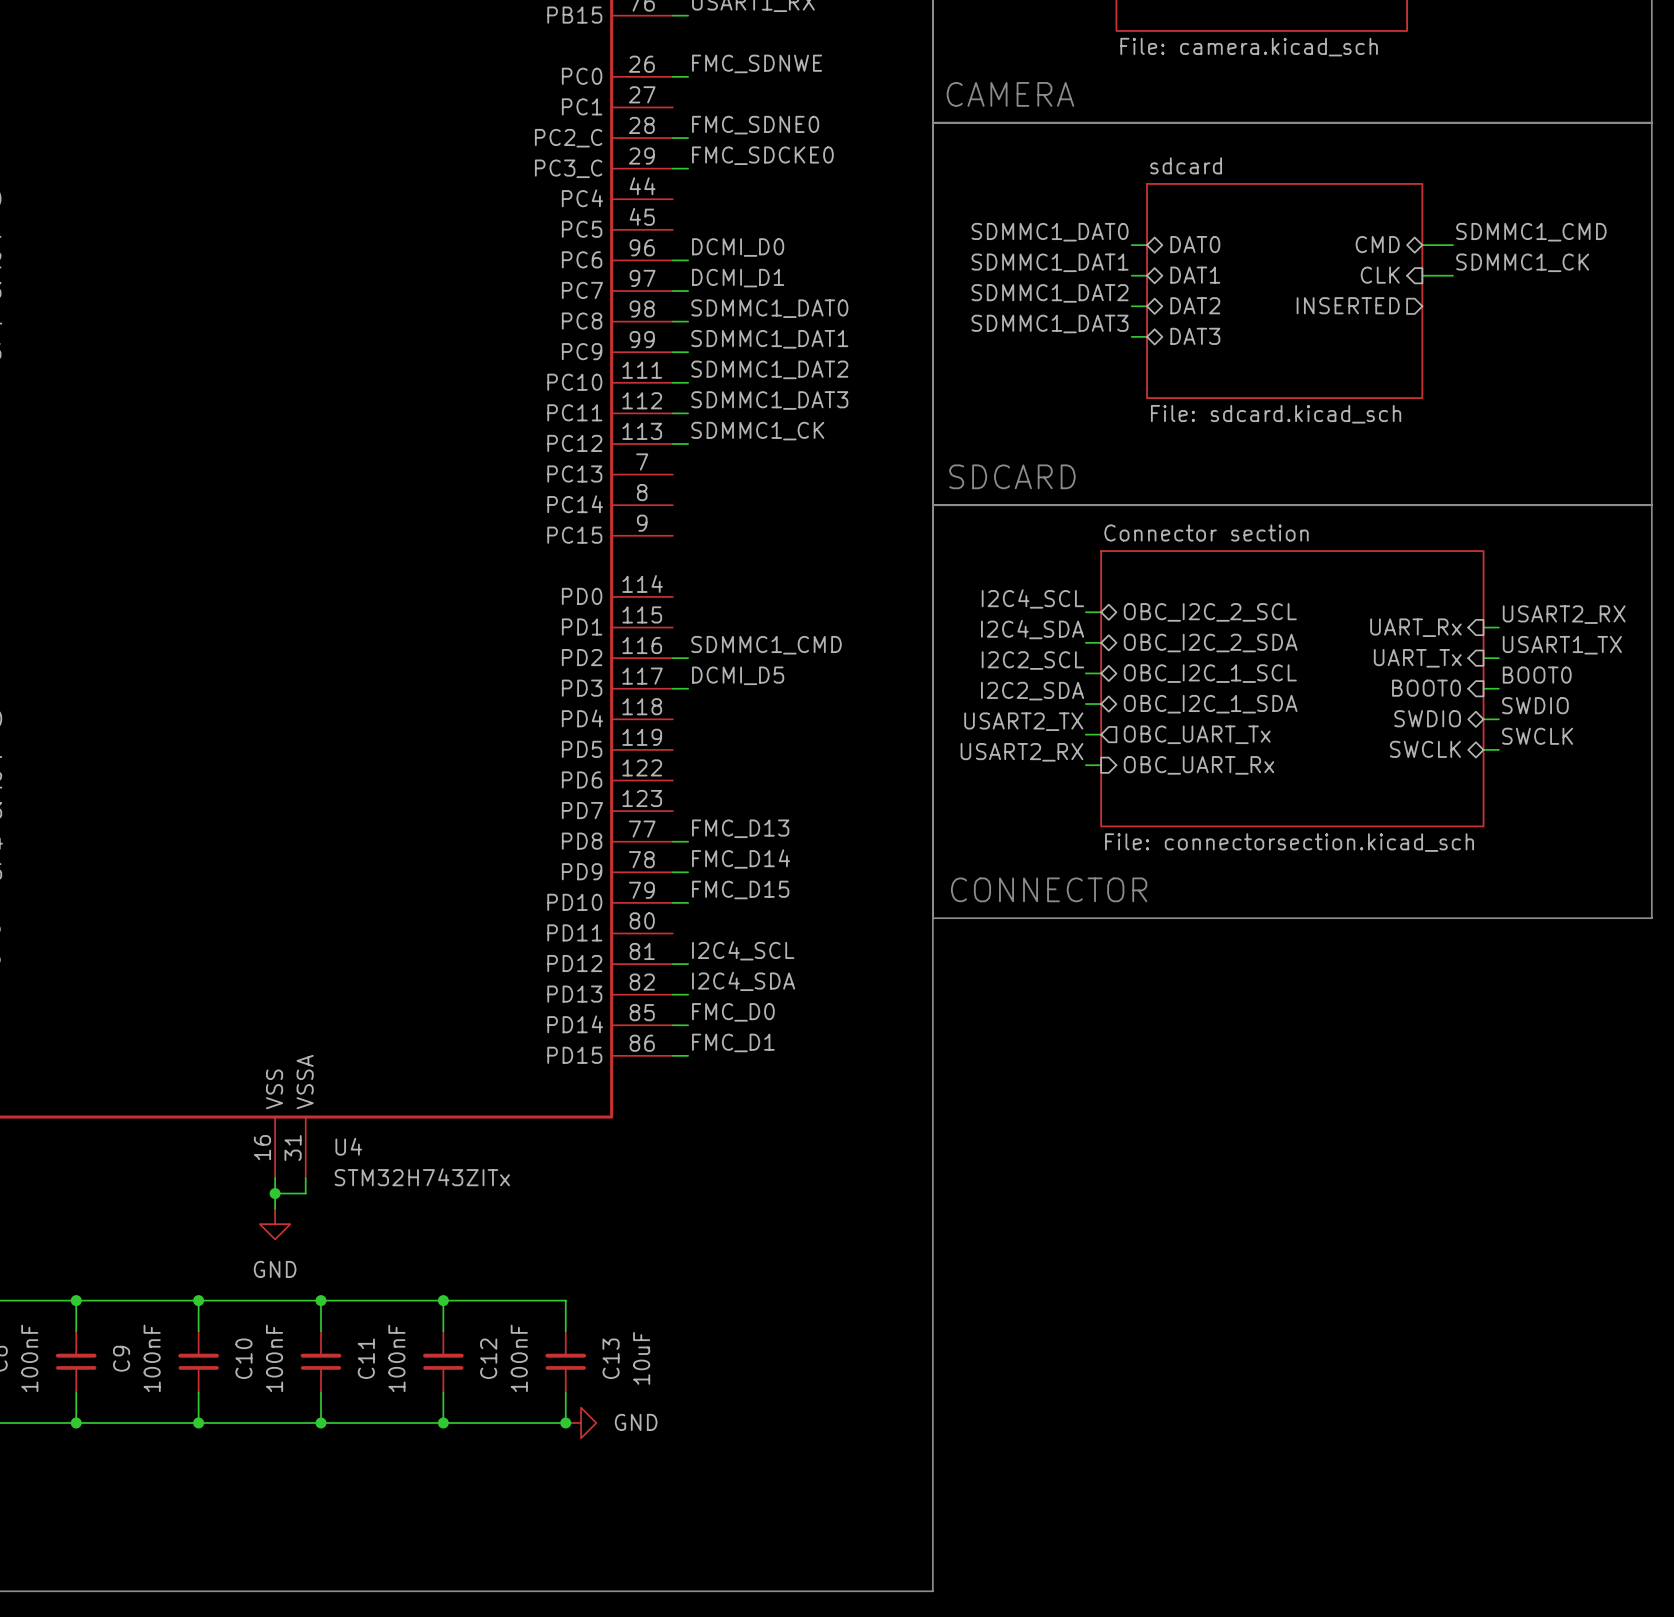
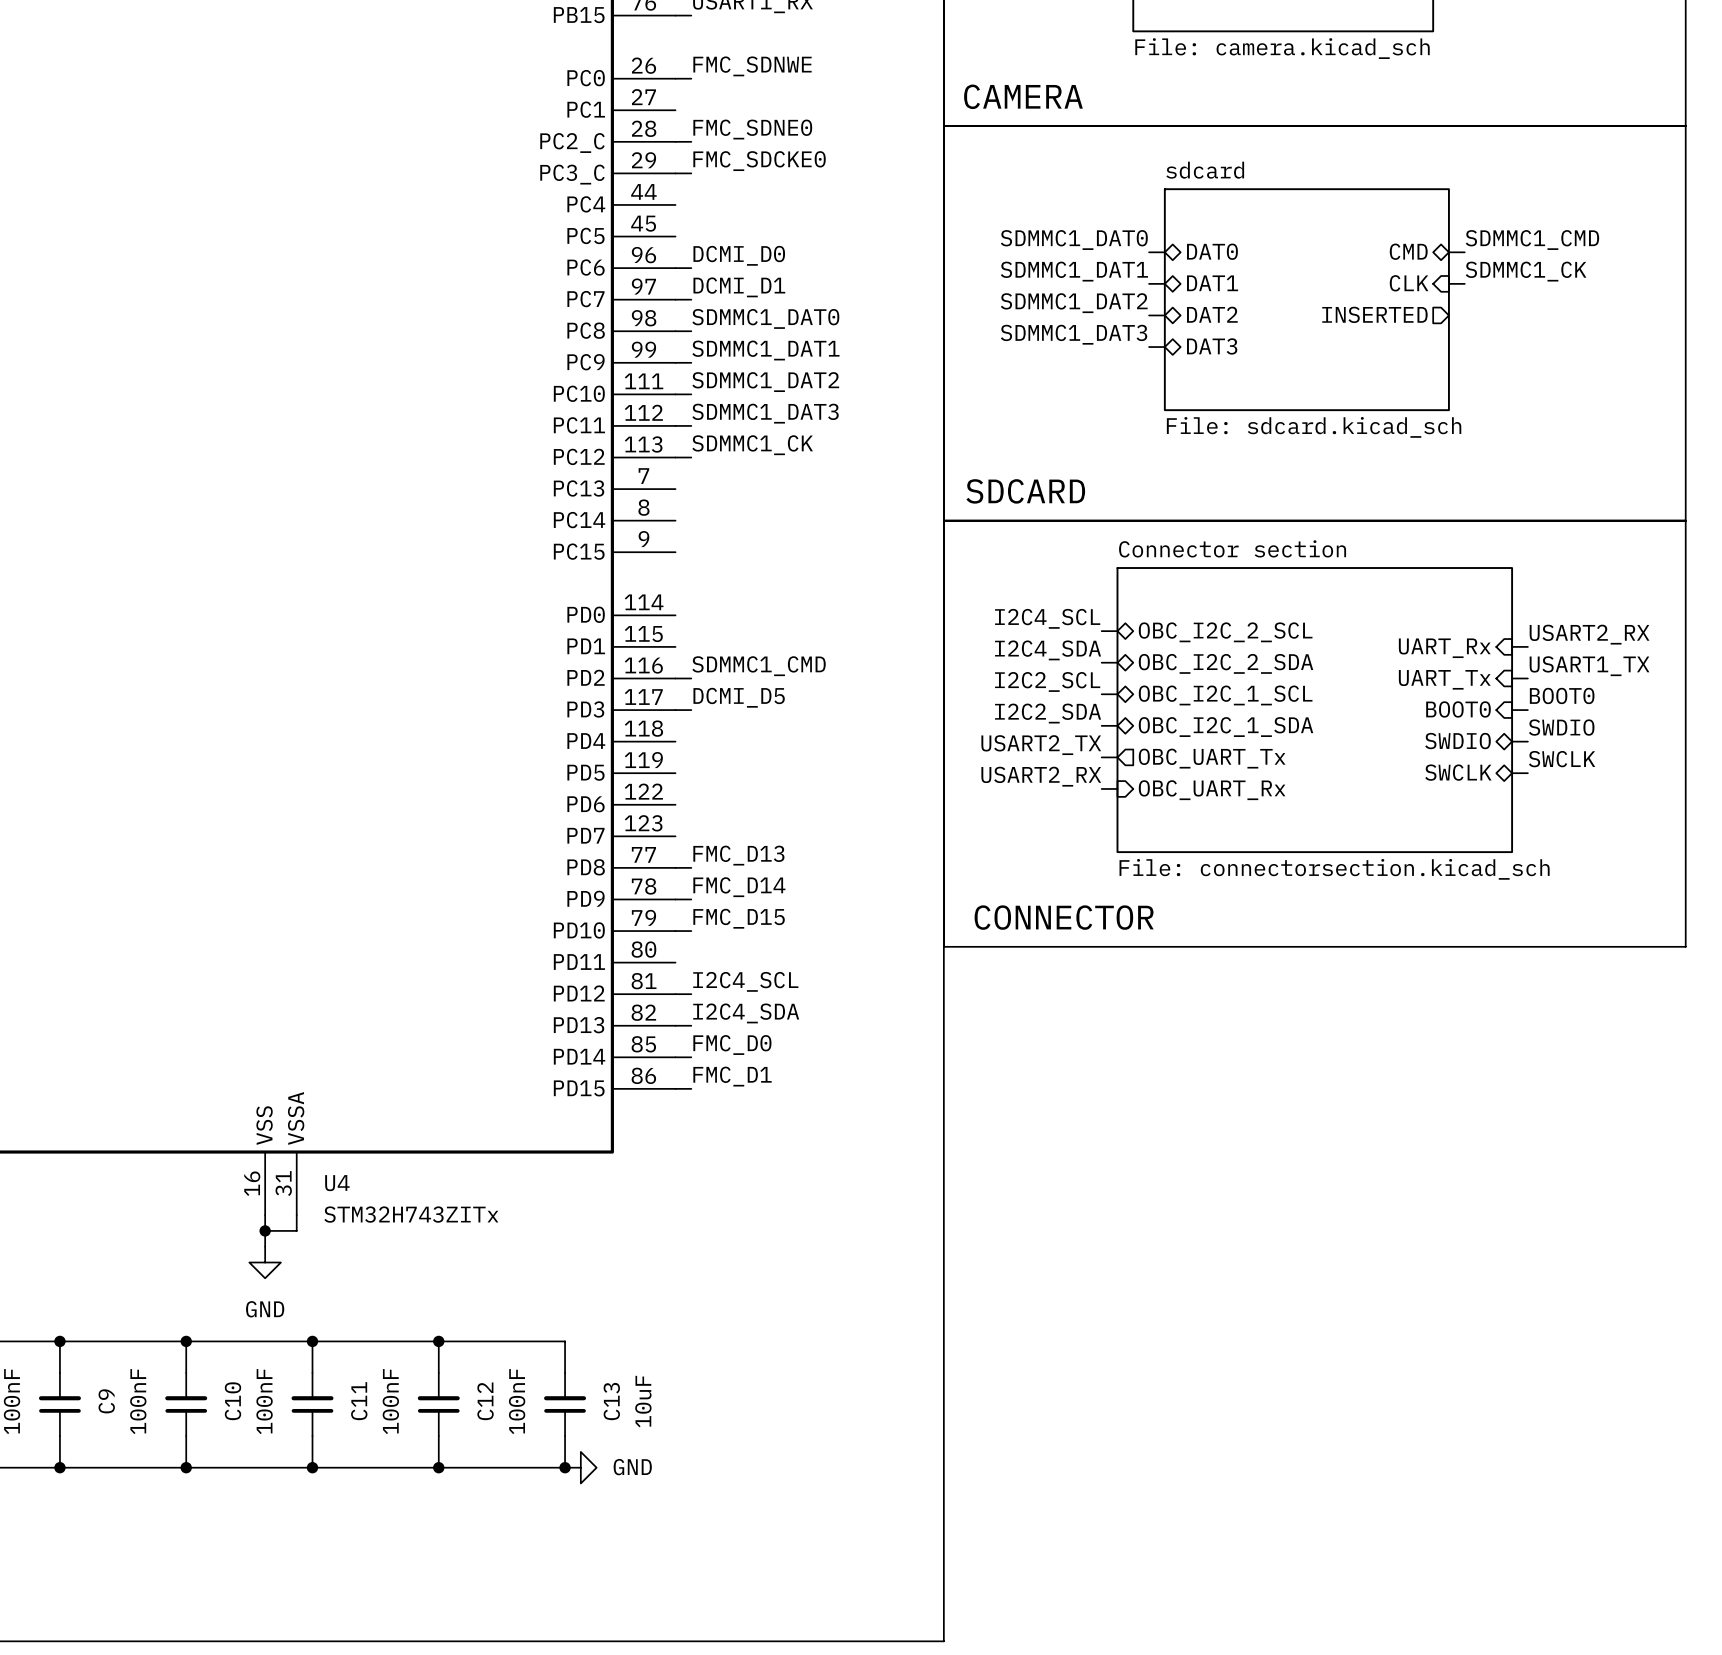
label position: SDMMC1_CMD (1531, 232) -> SDMMC1_CMD (1532, 240)
wire: (1437, 245) (1452, 245) -> none
label position: SDMMC1_CK (1522, 262) -> SDMMC1_CK (1526, 271)
wire: (1437, 275) (1452, 275) -> none

